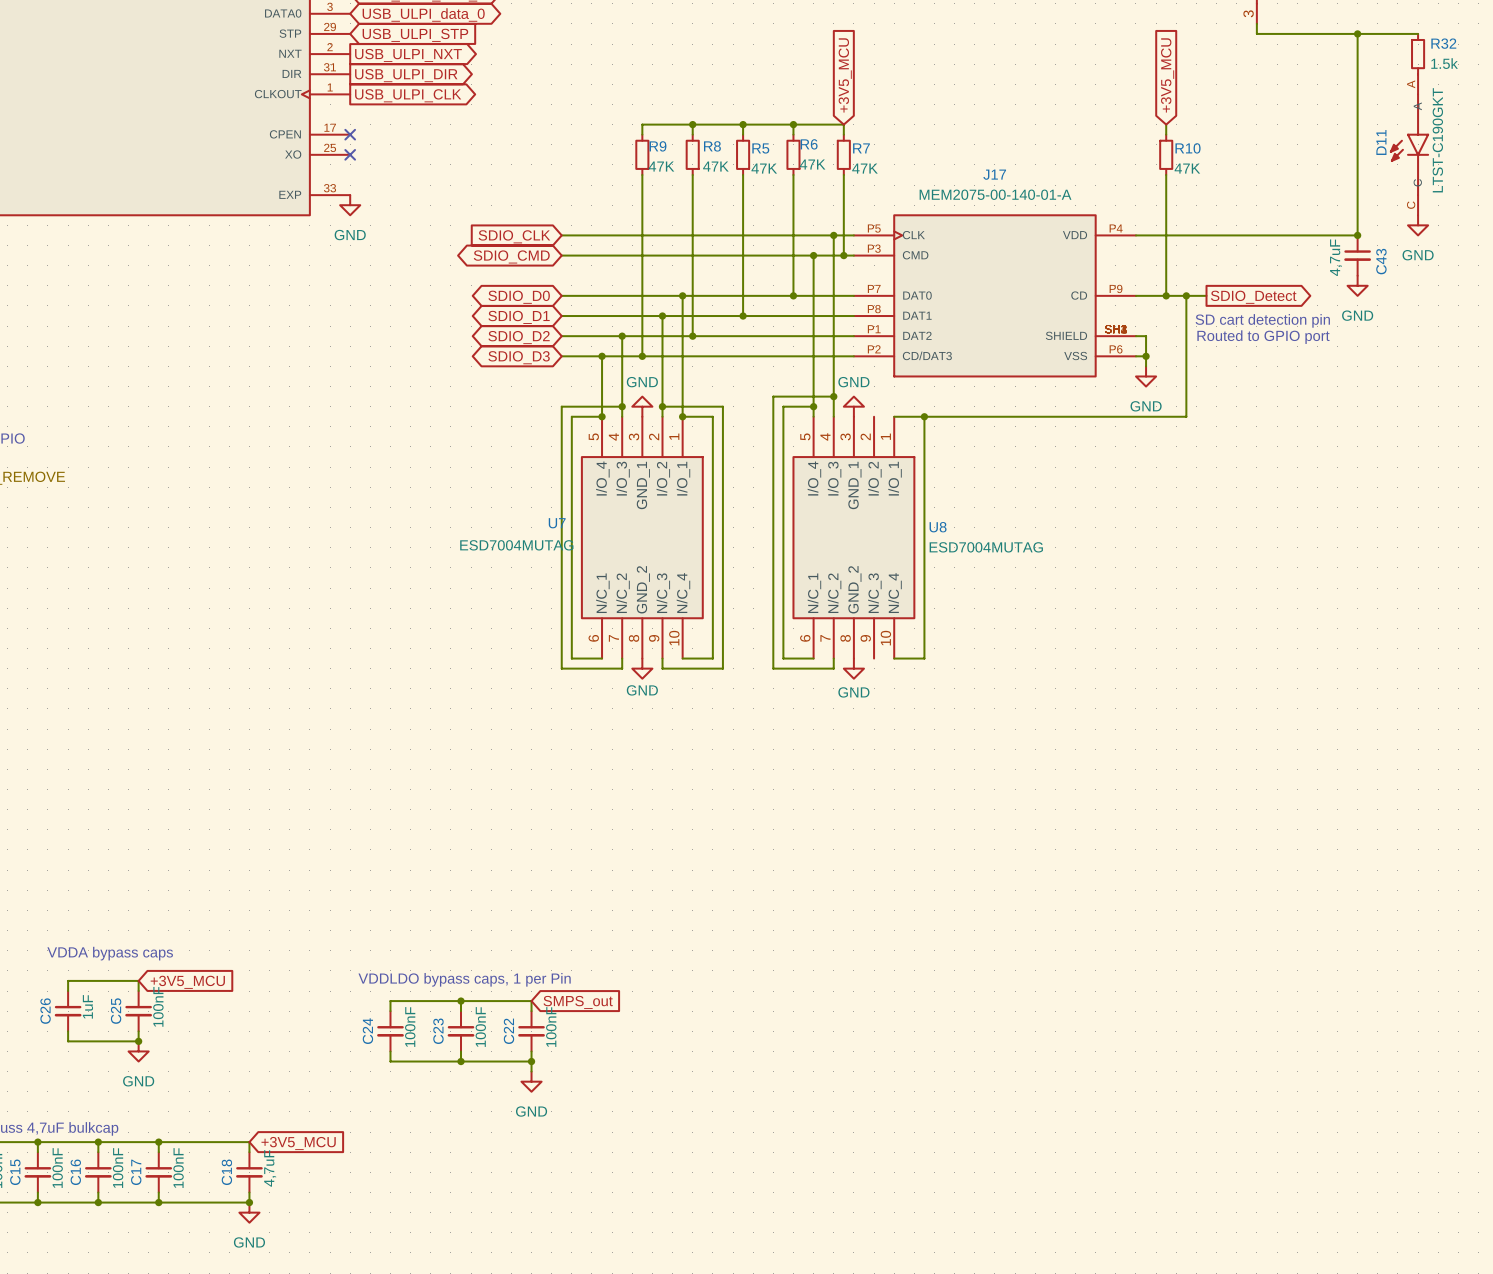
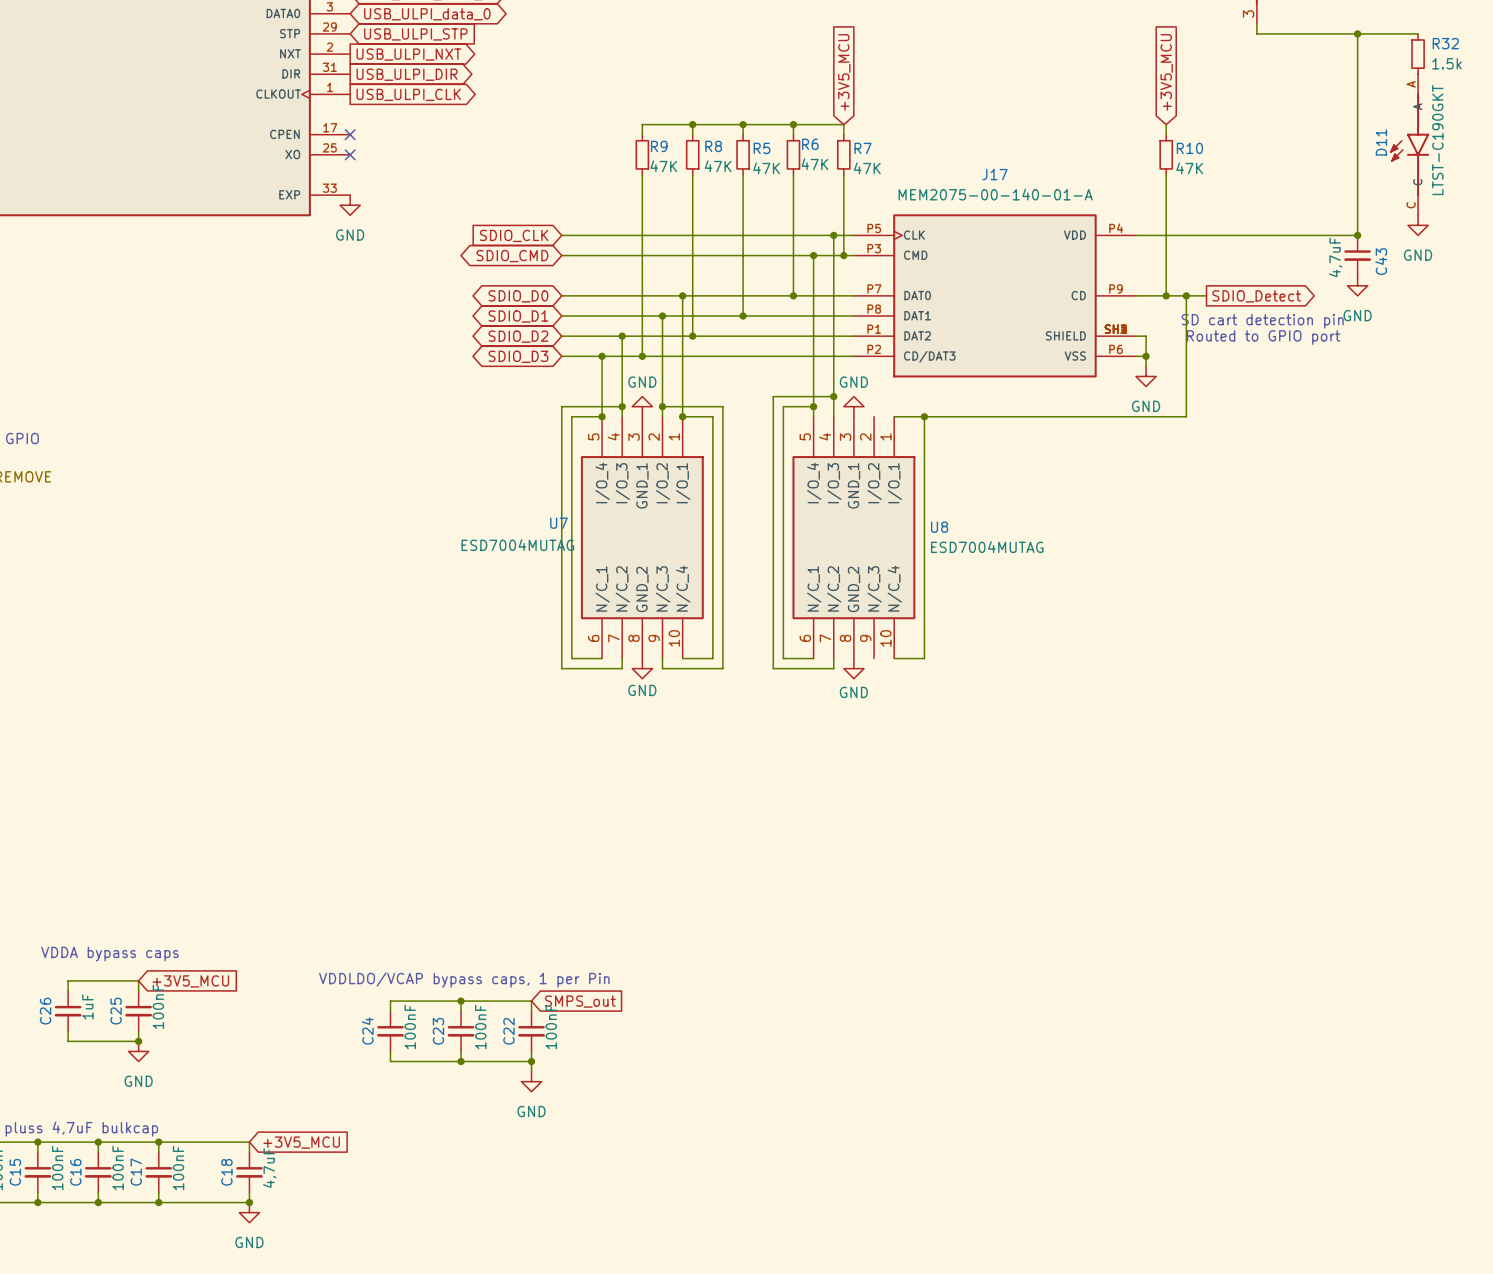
text: VDDLDO bypass caps, 1 per Pin (464, 979) -> VDDLDO/VCAP bypass caps, 1 per Pin (464, 980)

